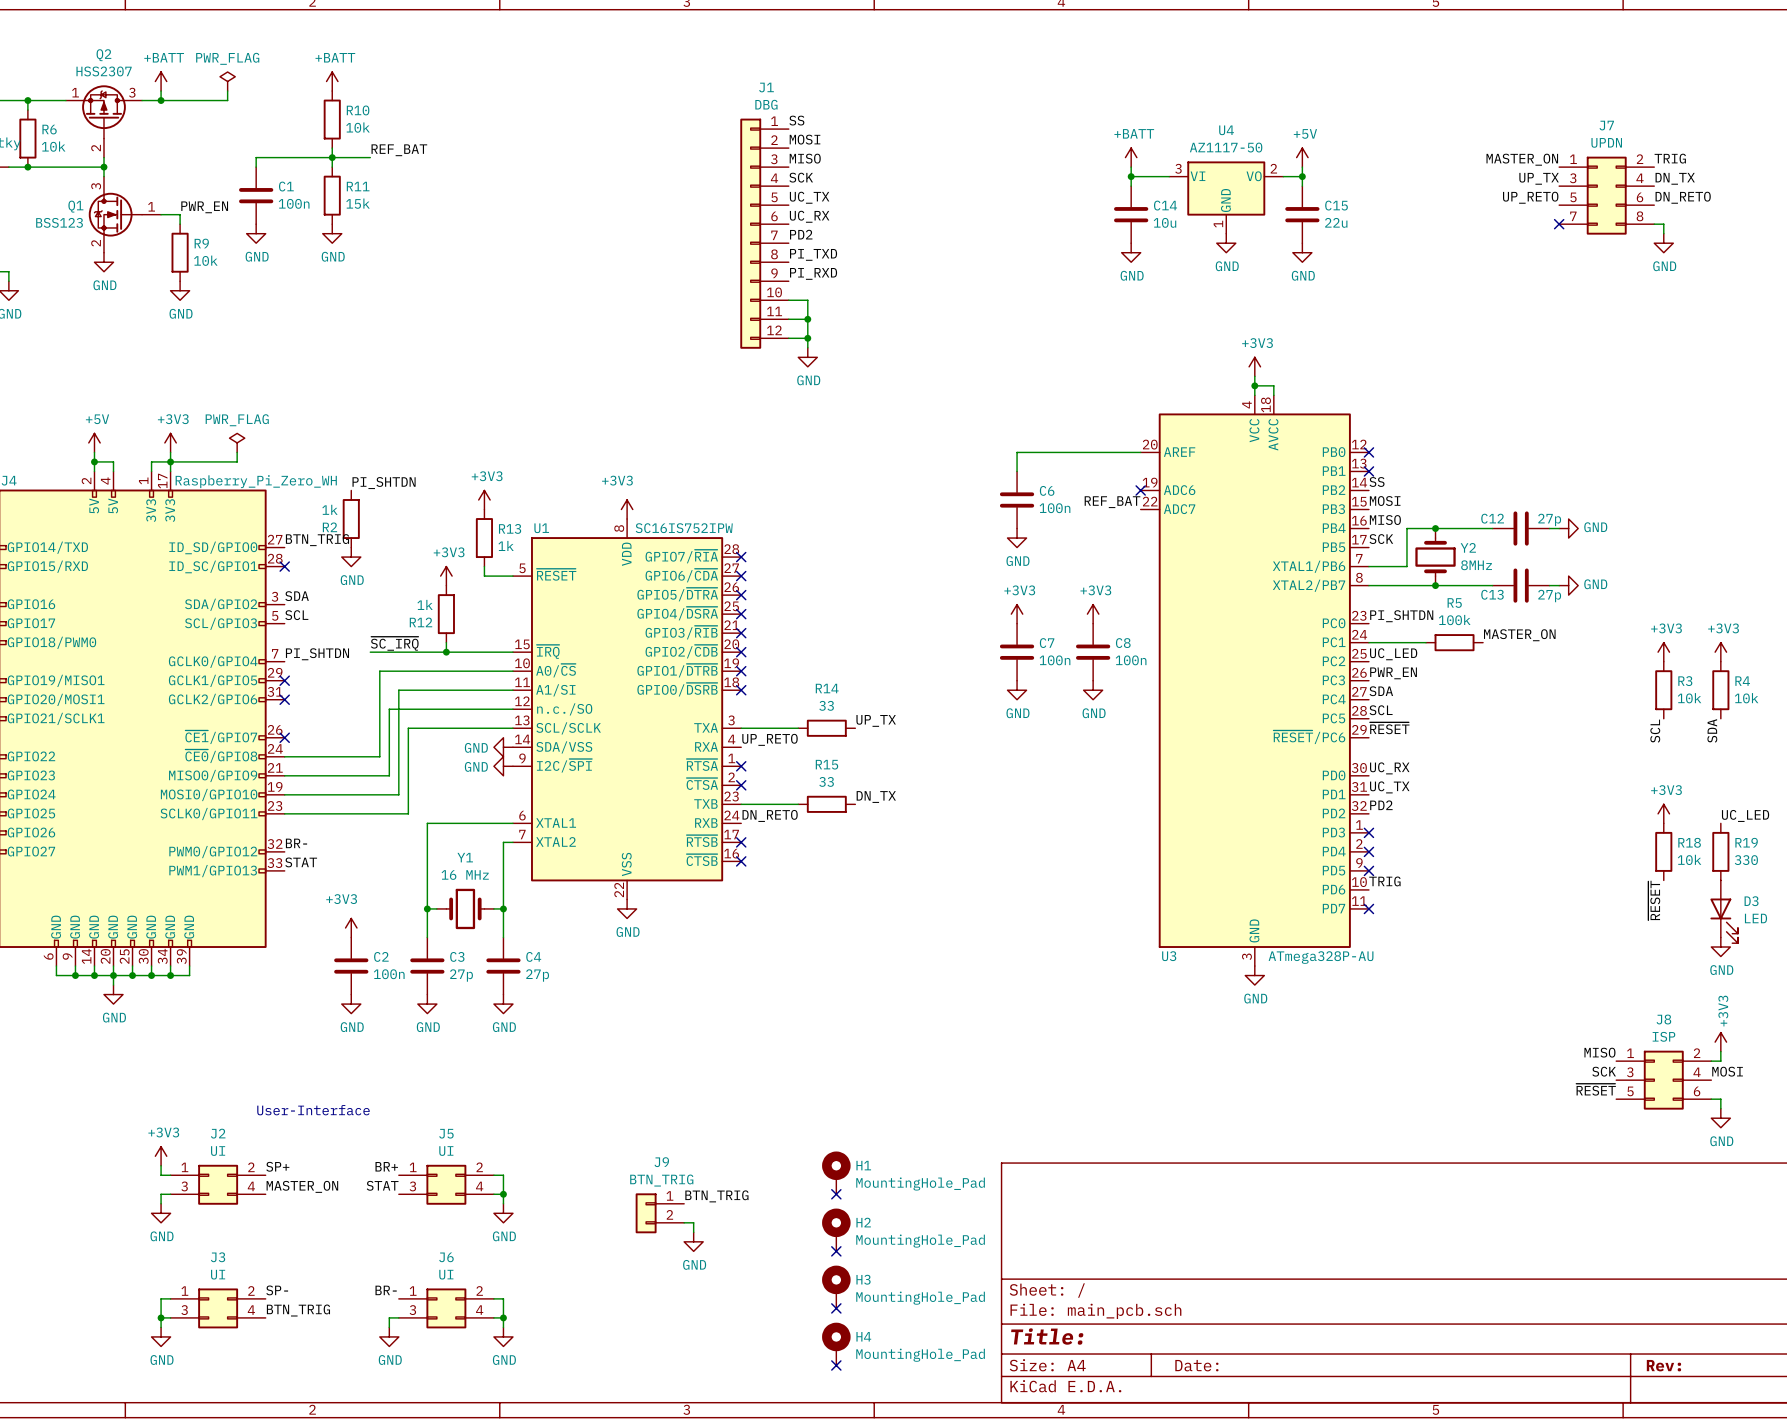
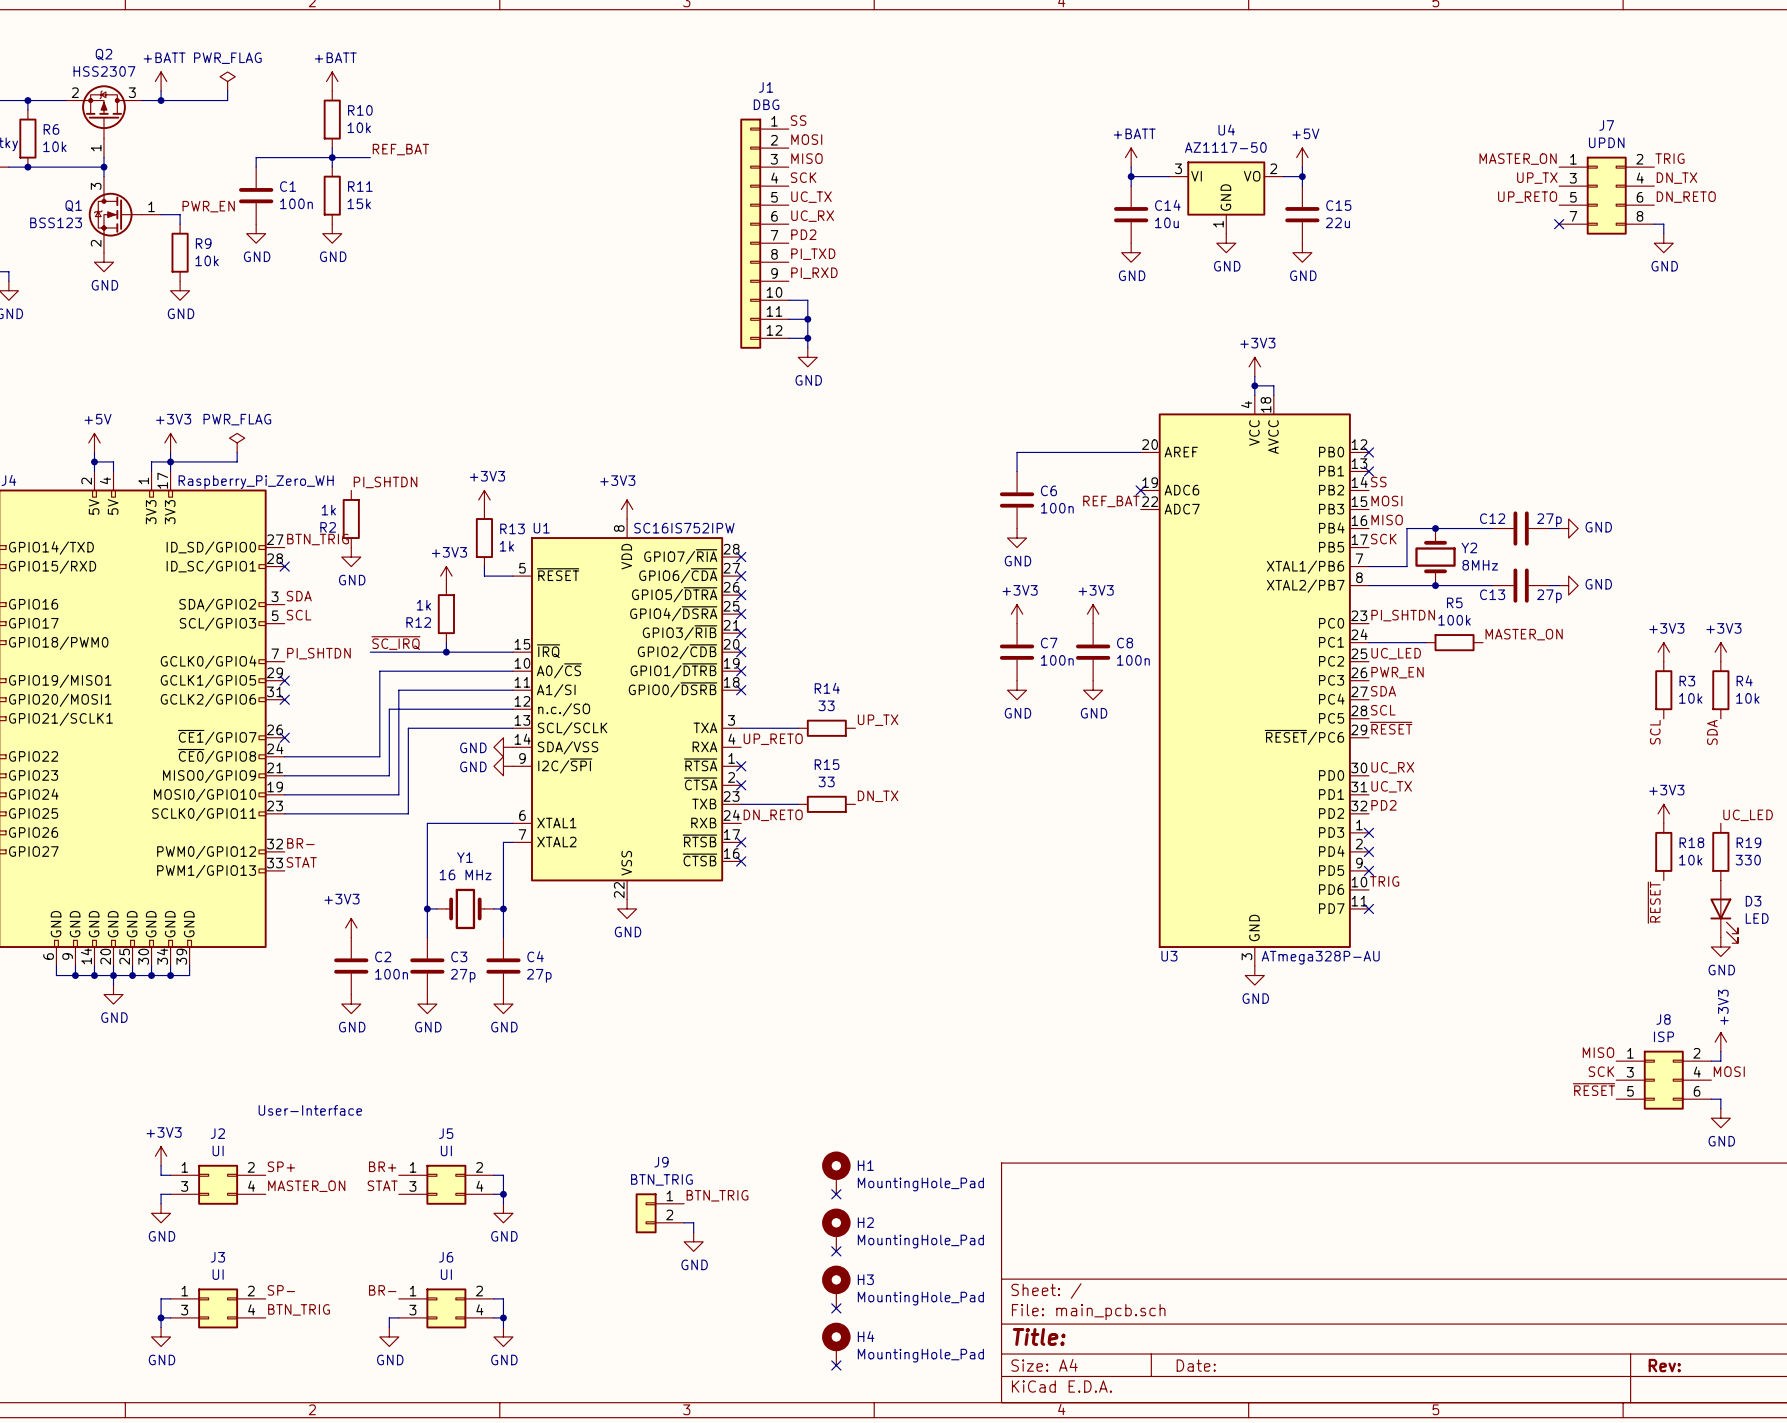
Q2 pin number: 1 (75, 92) -> 2 (75, 92)
Q2 pin number: 2 (96, 148) -> 1 (96, 148)

